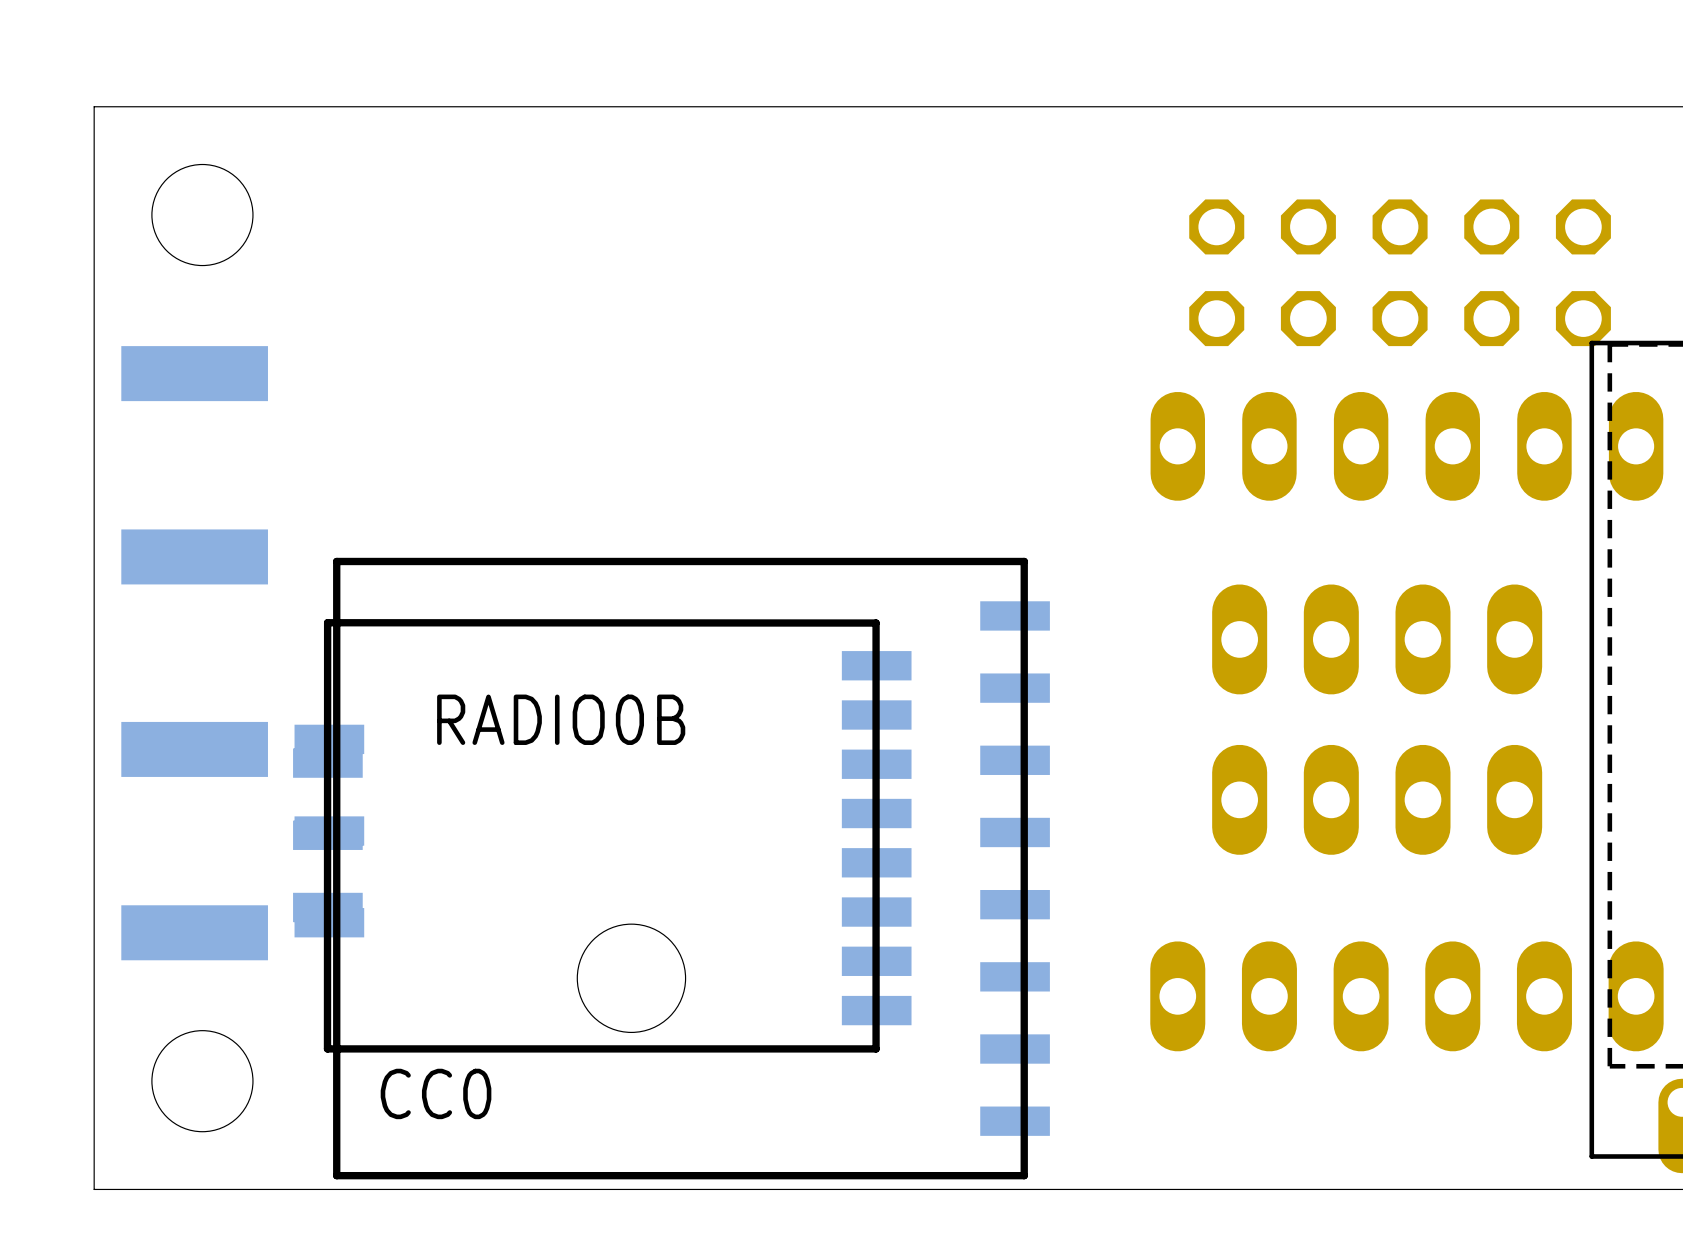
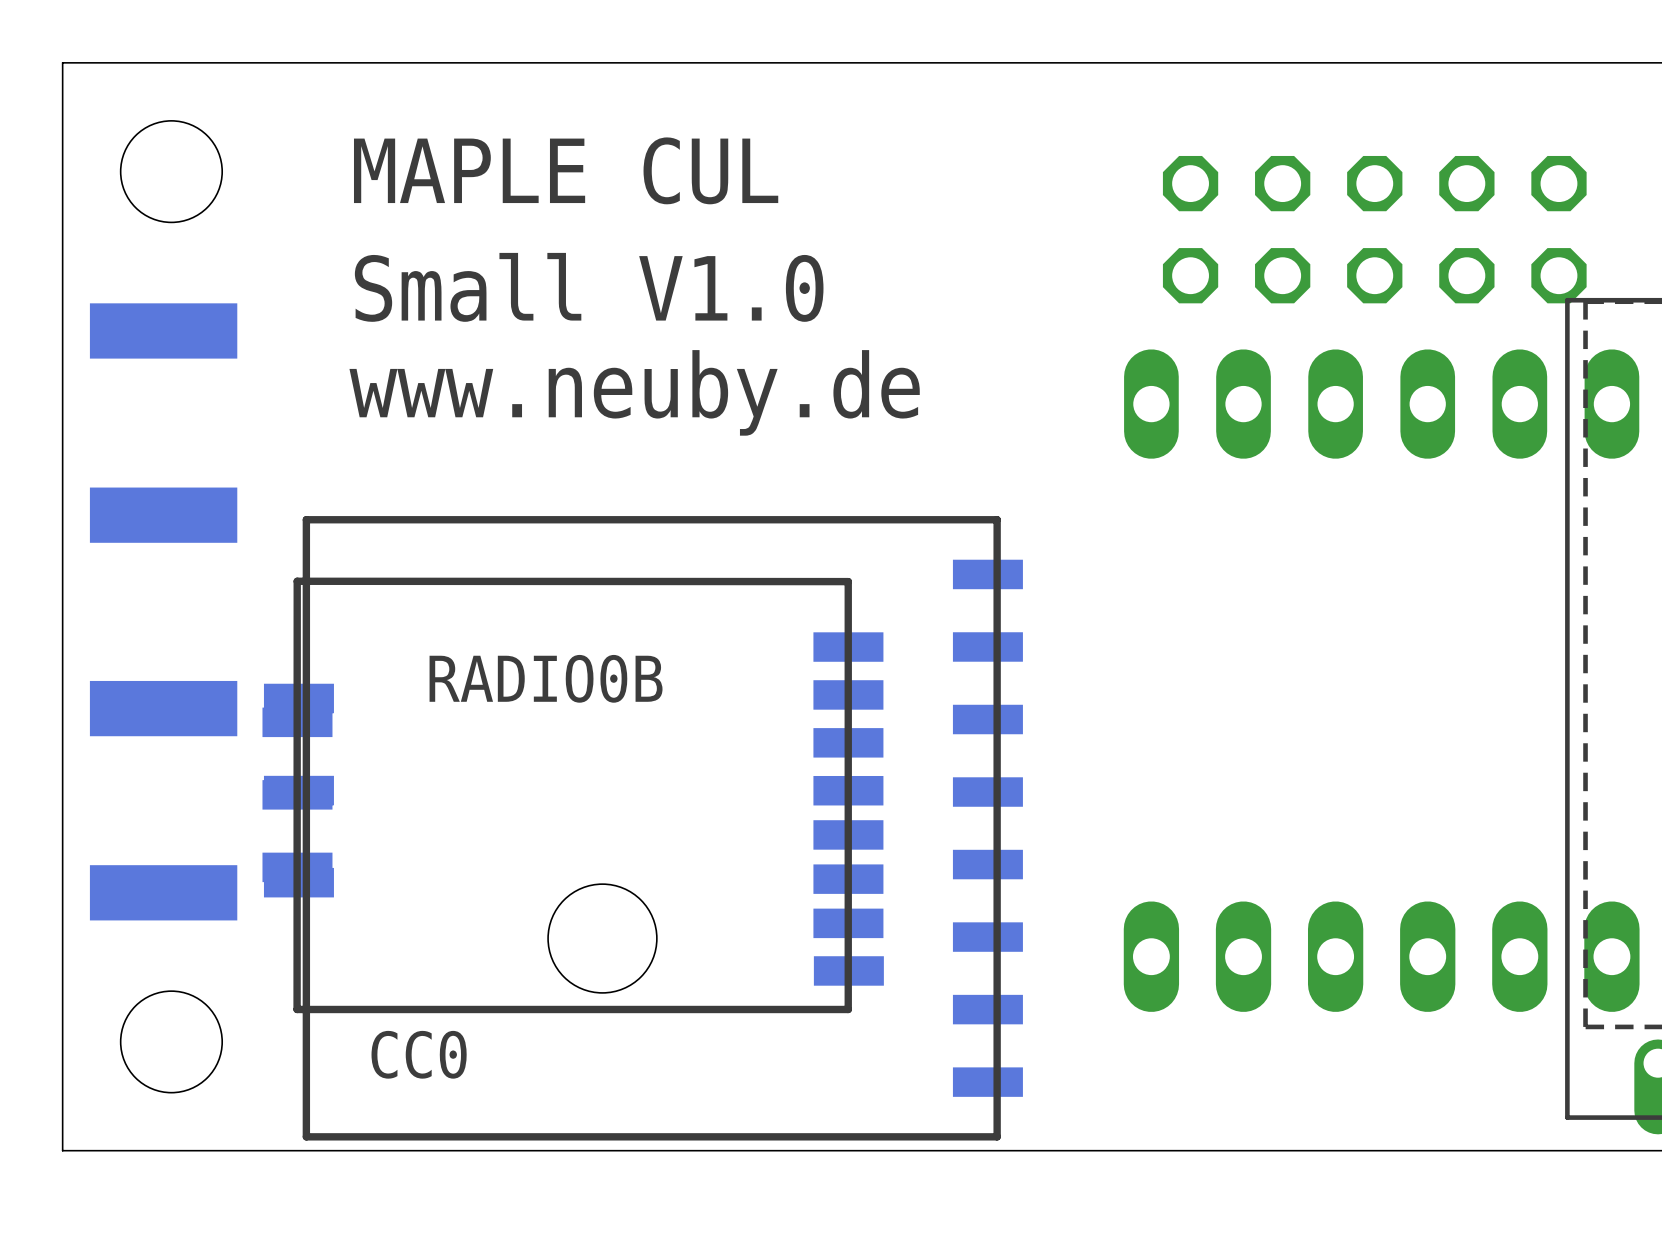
text: none -> MAPLE CUL (566, 170)
text: none -> Small V1.0 (589, 287)
text: none -> www.neuby.de (634, 392)
RADIO0B footprint: [293, 619, 912, 1053] -> [262, 577, 884, 1014]
part: (1377, 639) -> none
part: (1377, 799) -> none

